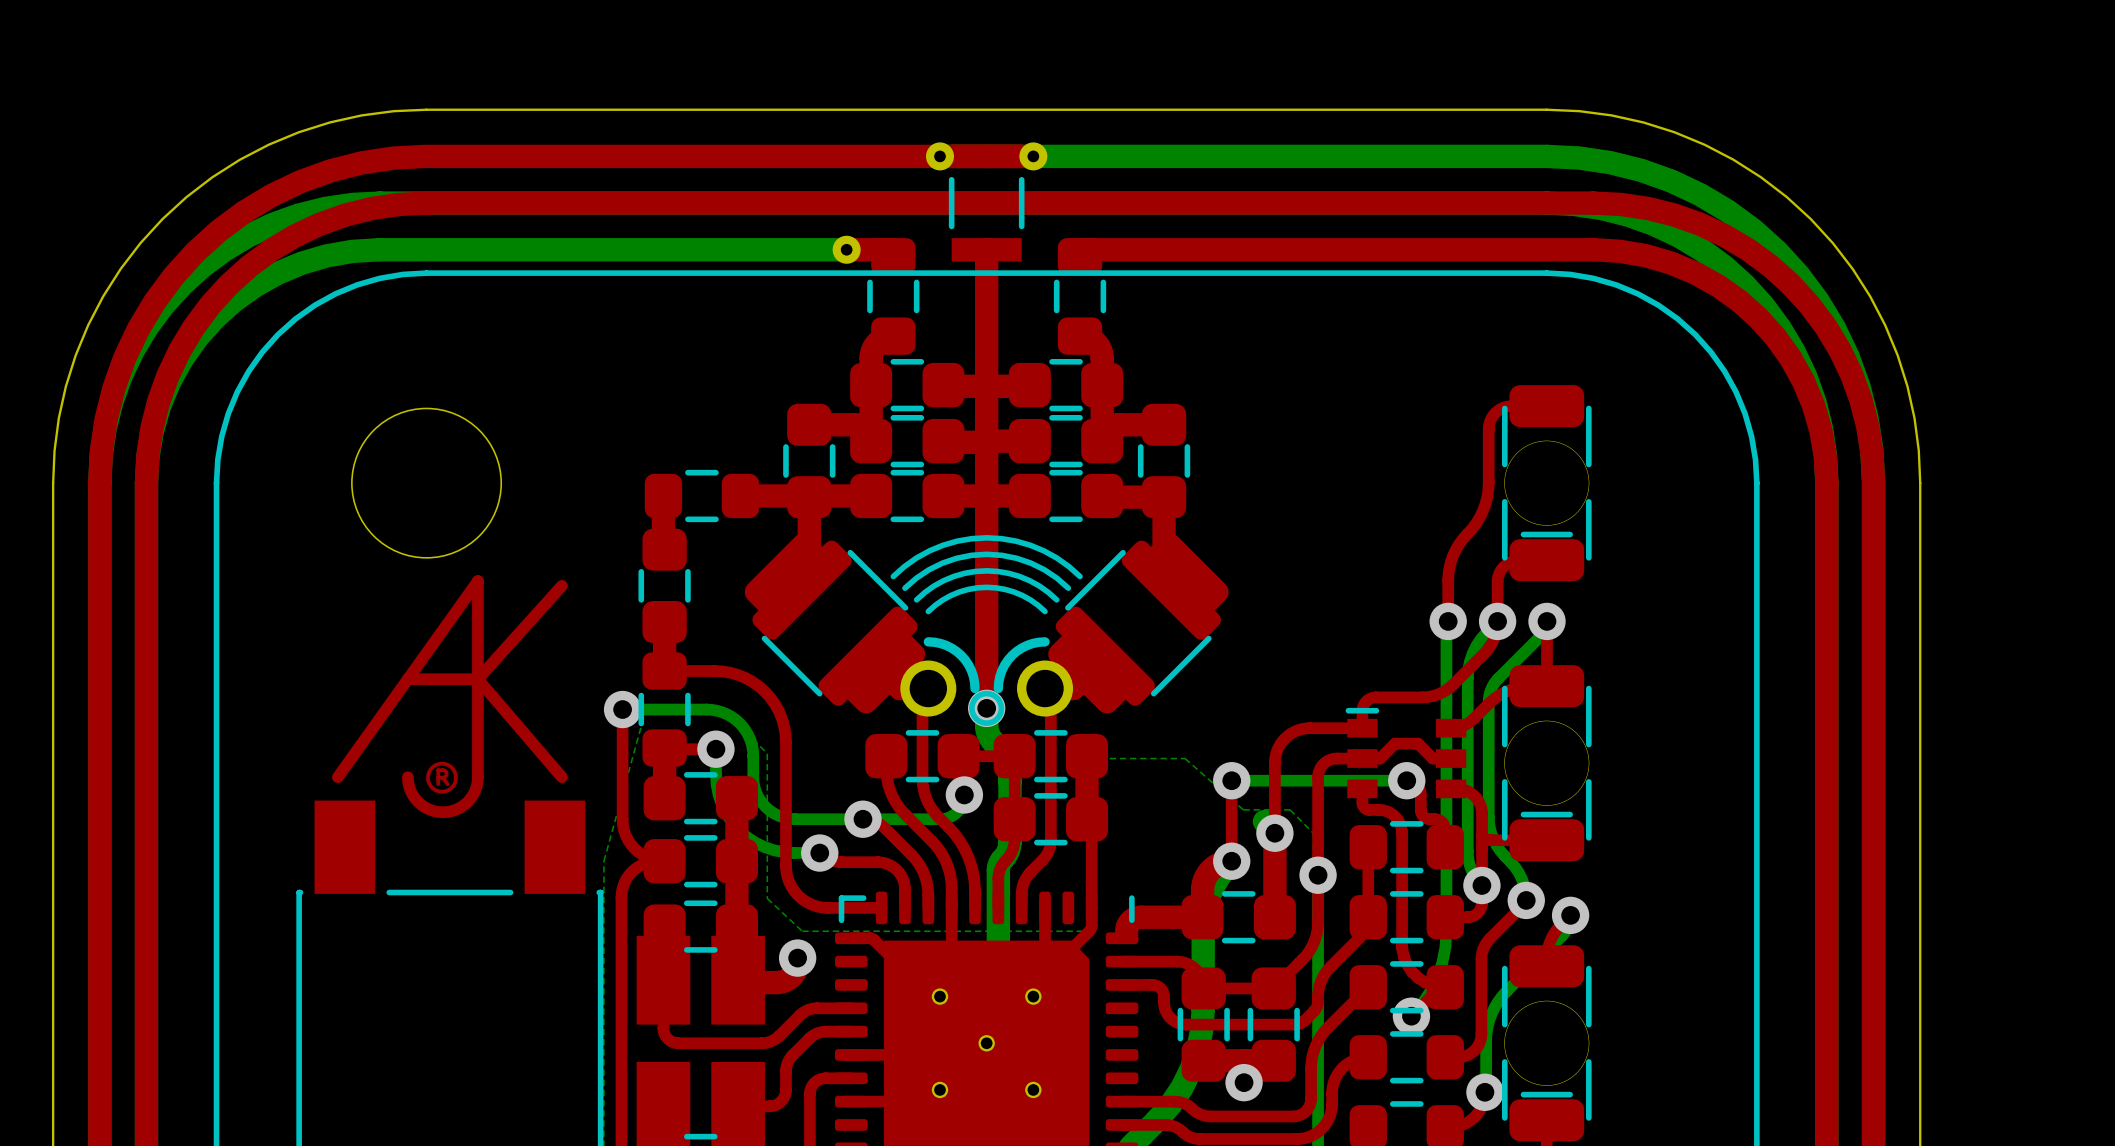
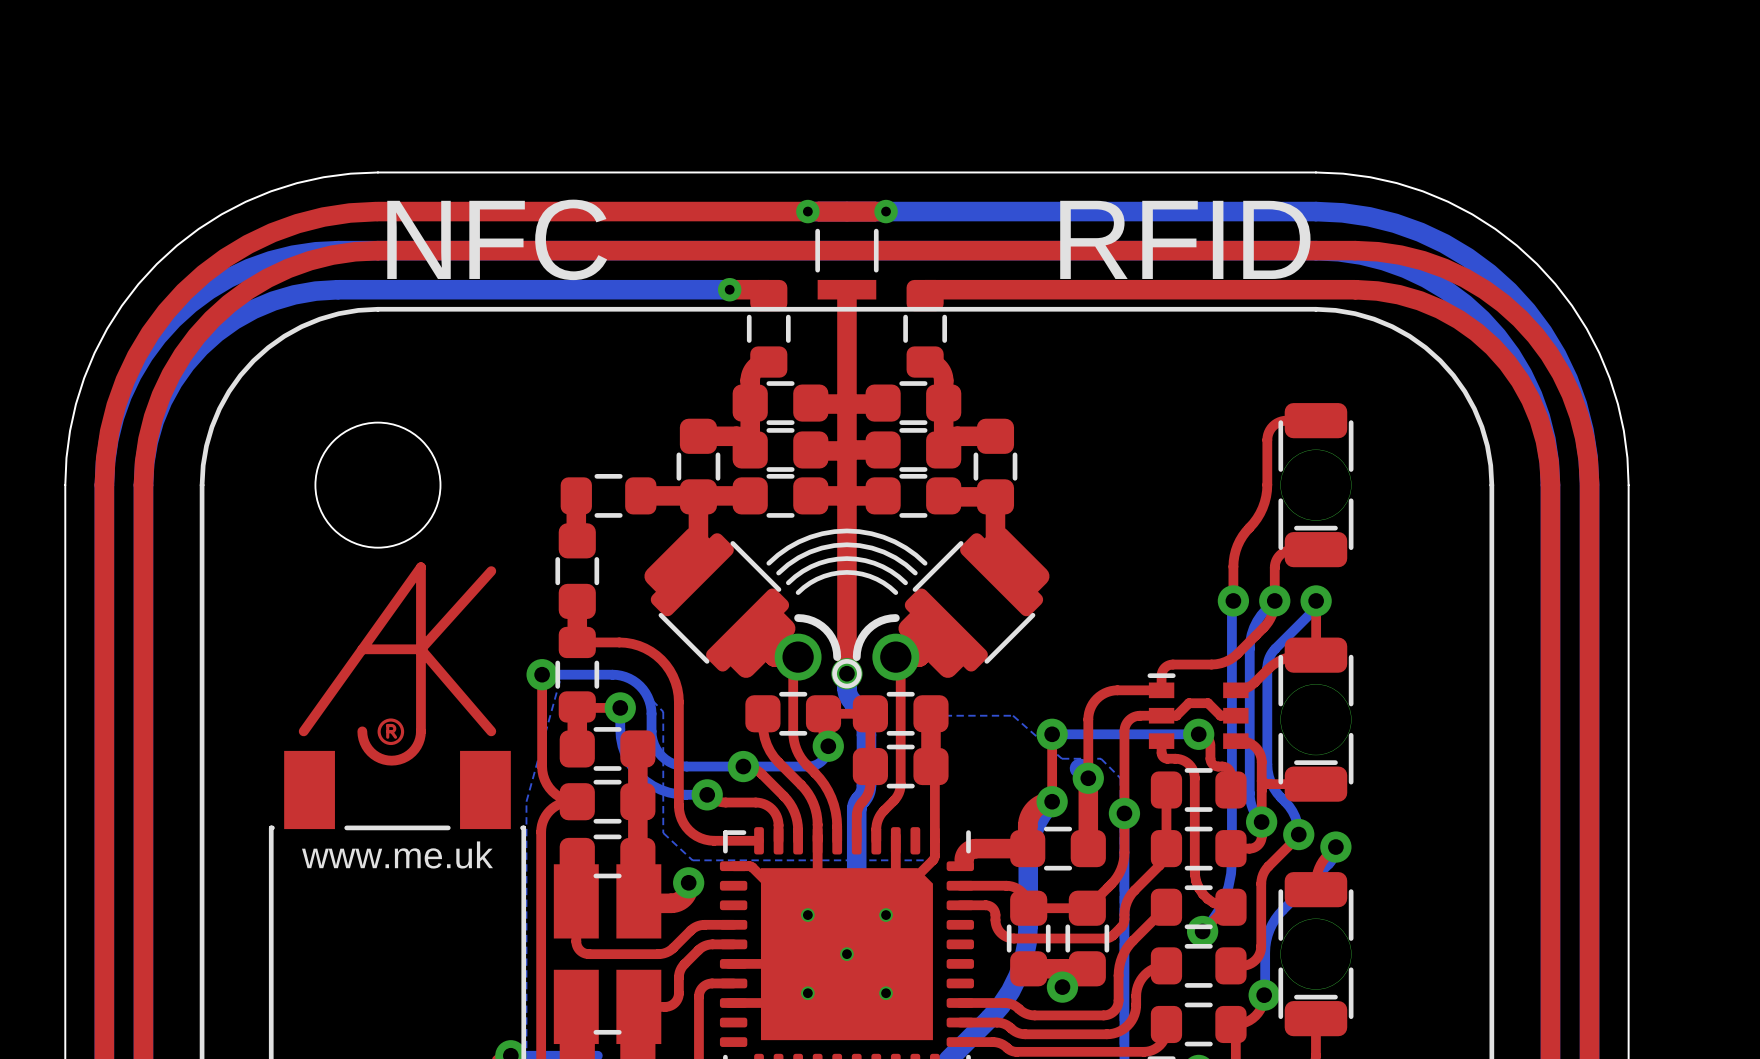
text: none -> NFC (497, 239)
text: none -> RFID (1185, 239)
drawing shape: [332, 575, 568, 819] -> [298, 562, 497, 869]

